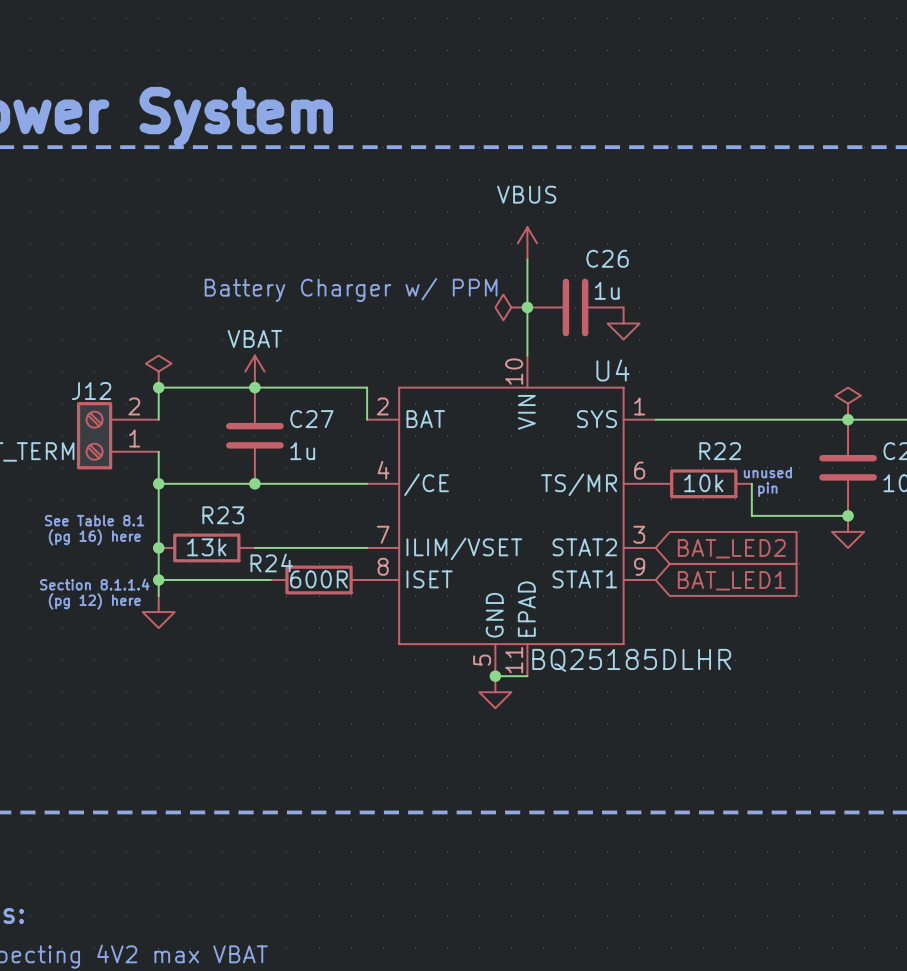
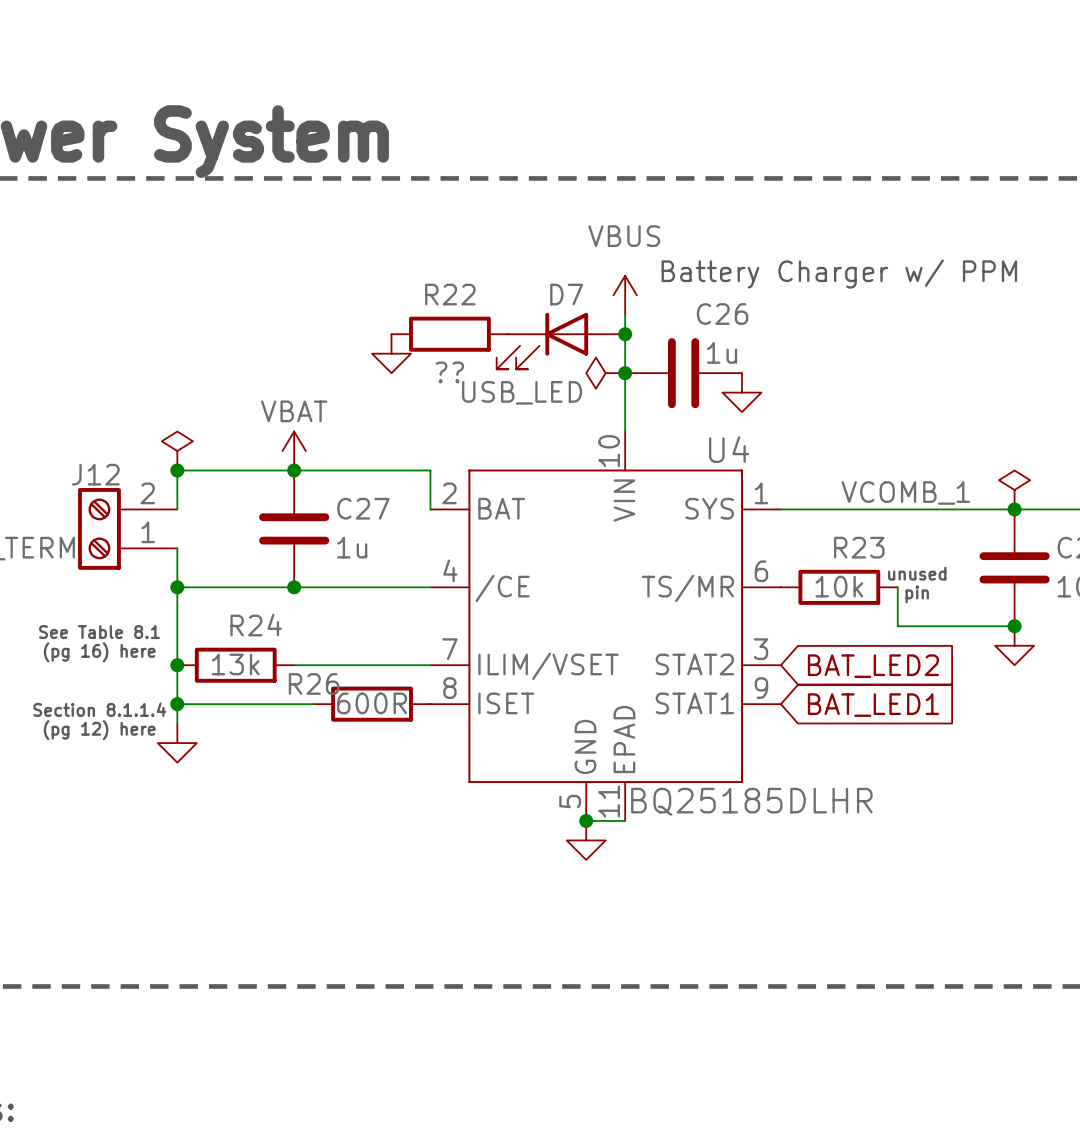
text: none -> Battery Charger w/ PPM (839, 274)
R22: none -> ?? (449, 334)
junction: none -> (625, 334)
D7: none -> USB_LED (560, 341)
text: Battery Charger w/ PPM (351, 289) -> none
power symbol: none -> (391, 353)
label: none -> VCOMB_1 (905, 492)
R22 name: R22 (720, 451) -> R23 (859, 547)
R23 name: R23 (223, 515) -> R24 (256, 625)
R24 name: R24 (271, 562) -> R26 (314, 683)

